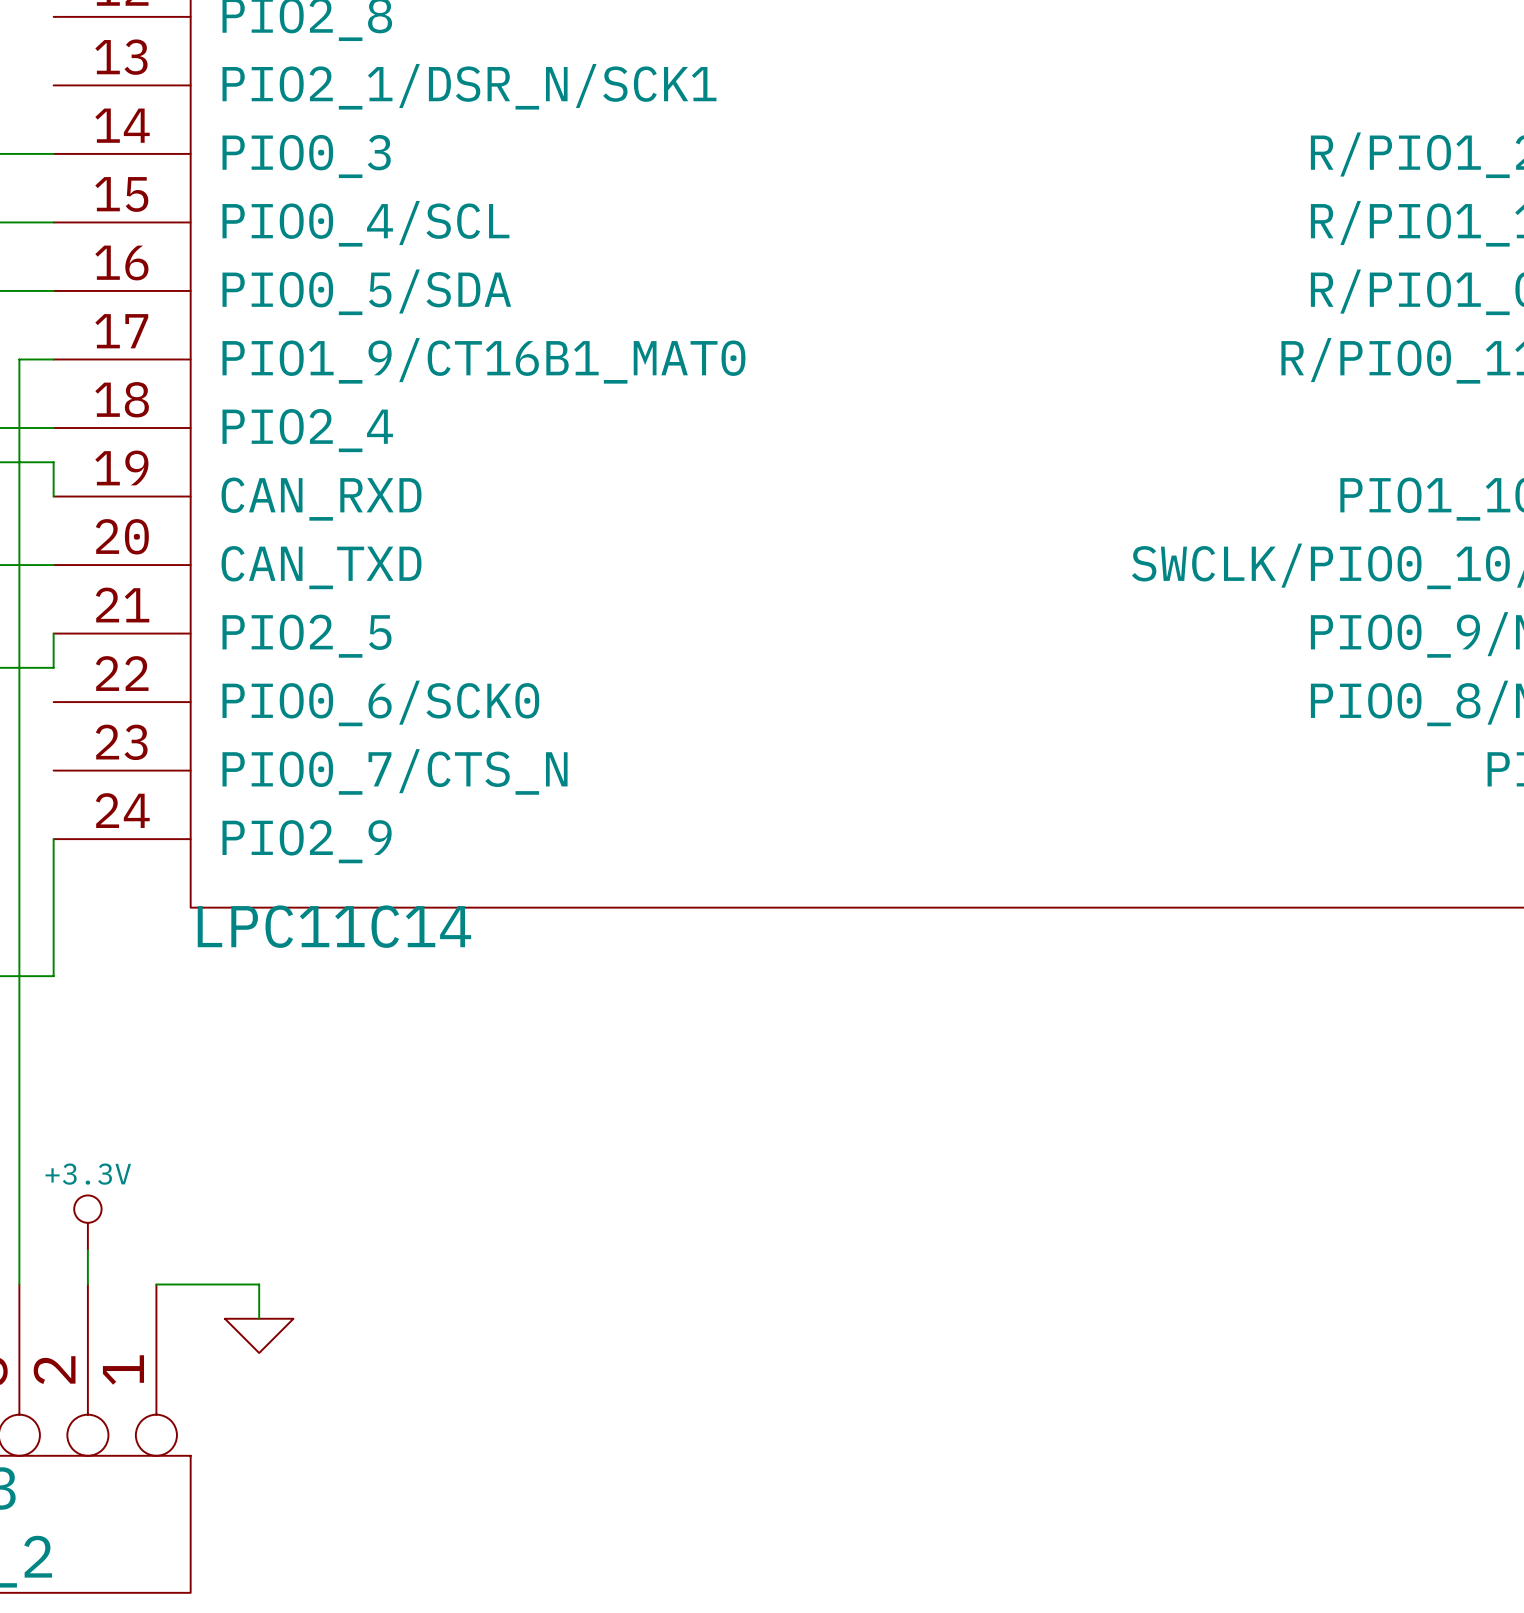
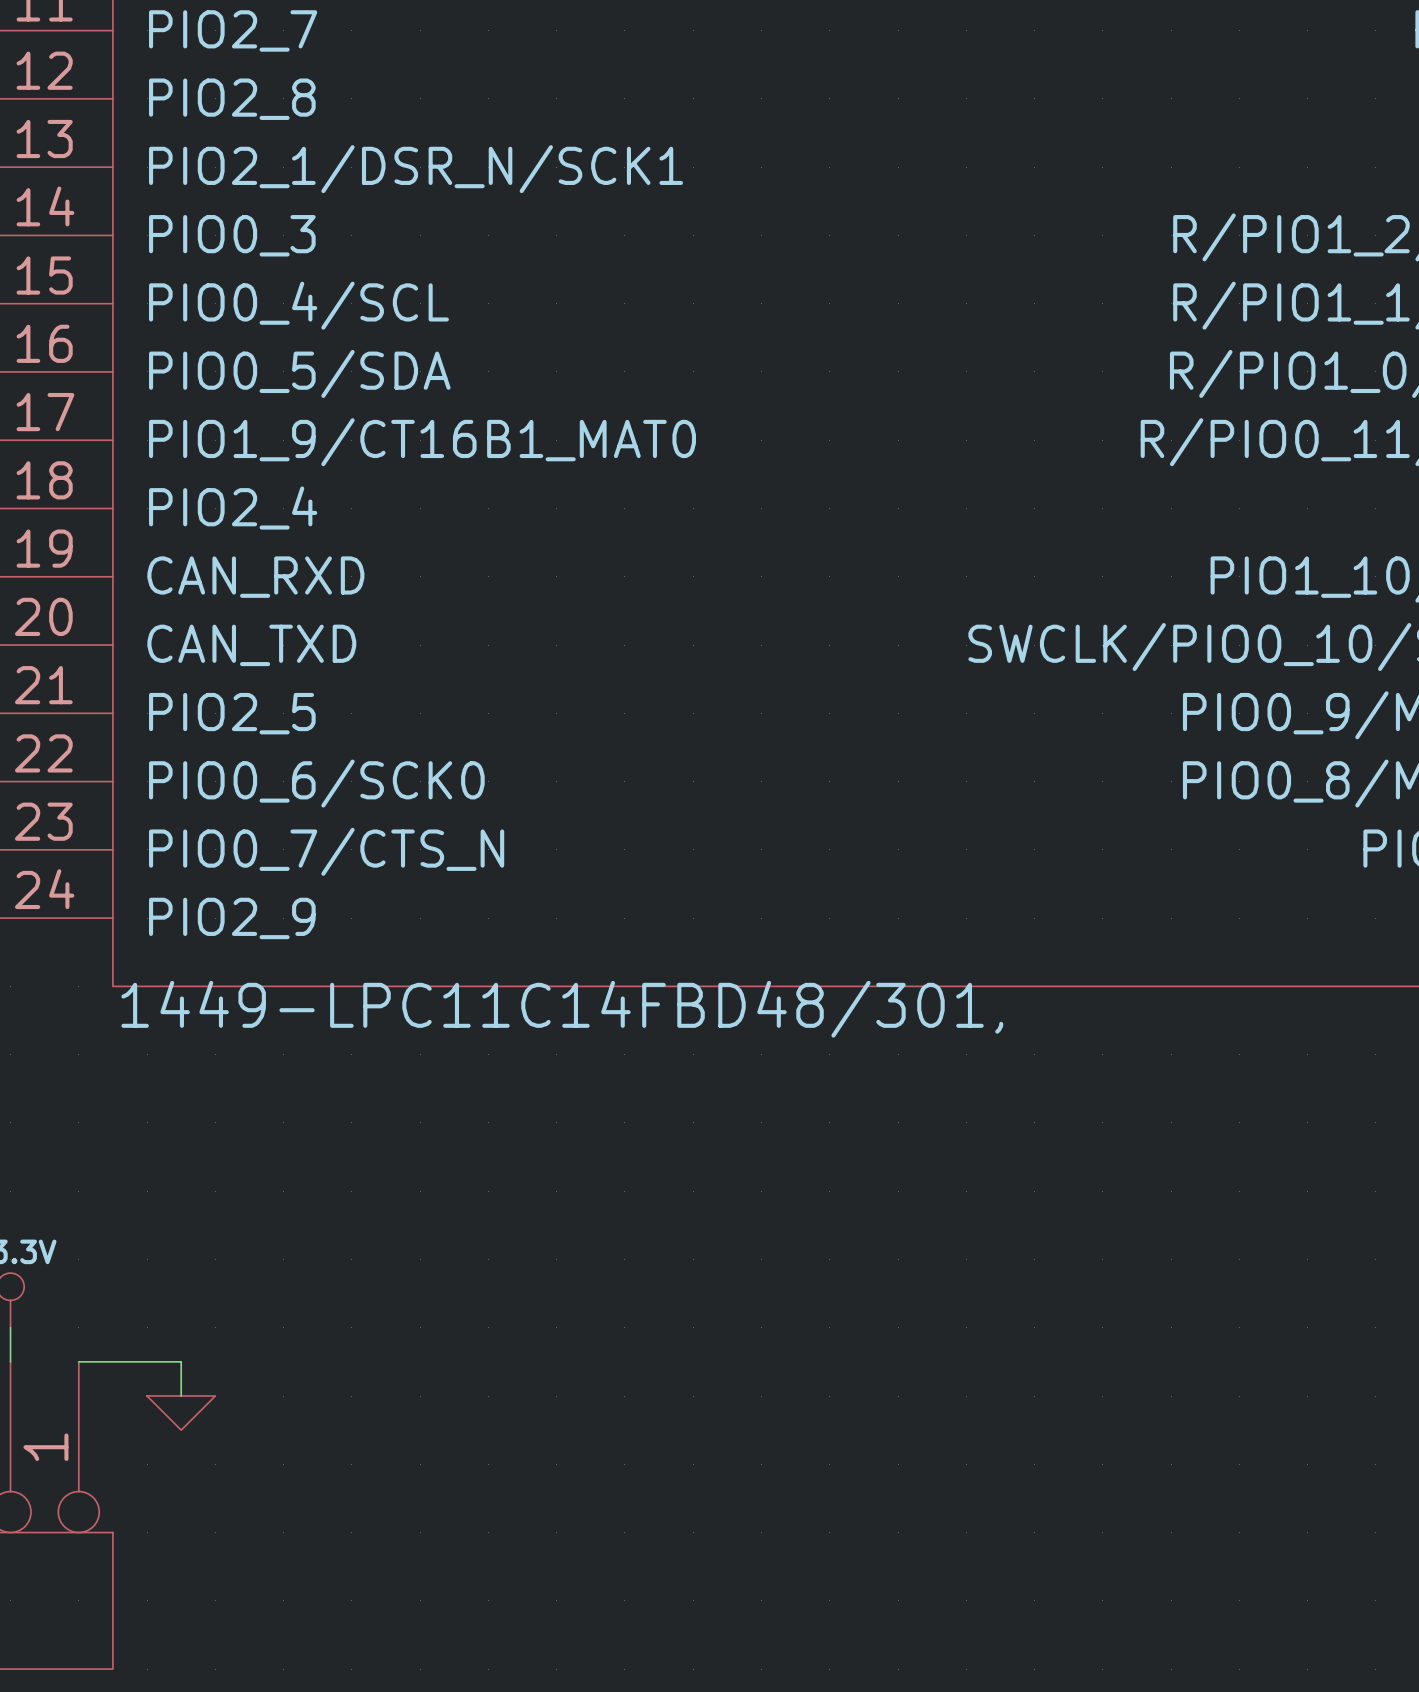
part value: LPC11C14 (334, 926) -> 1449-LPC11C14FBD48/301, (562, 1009)

